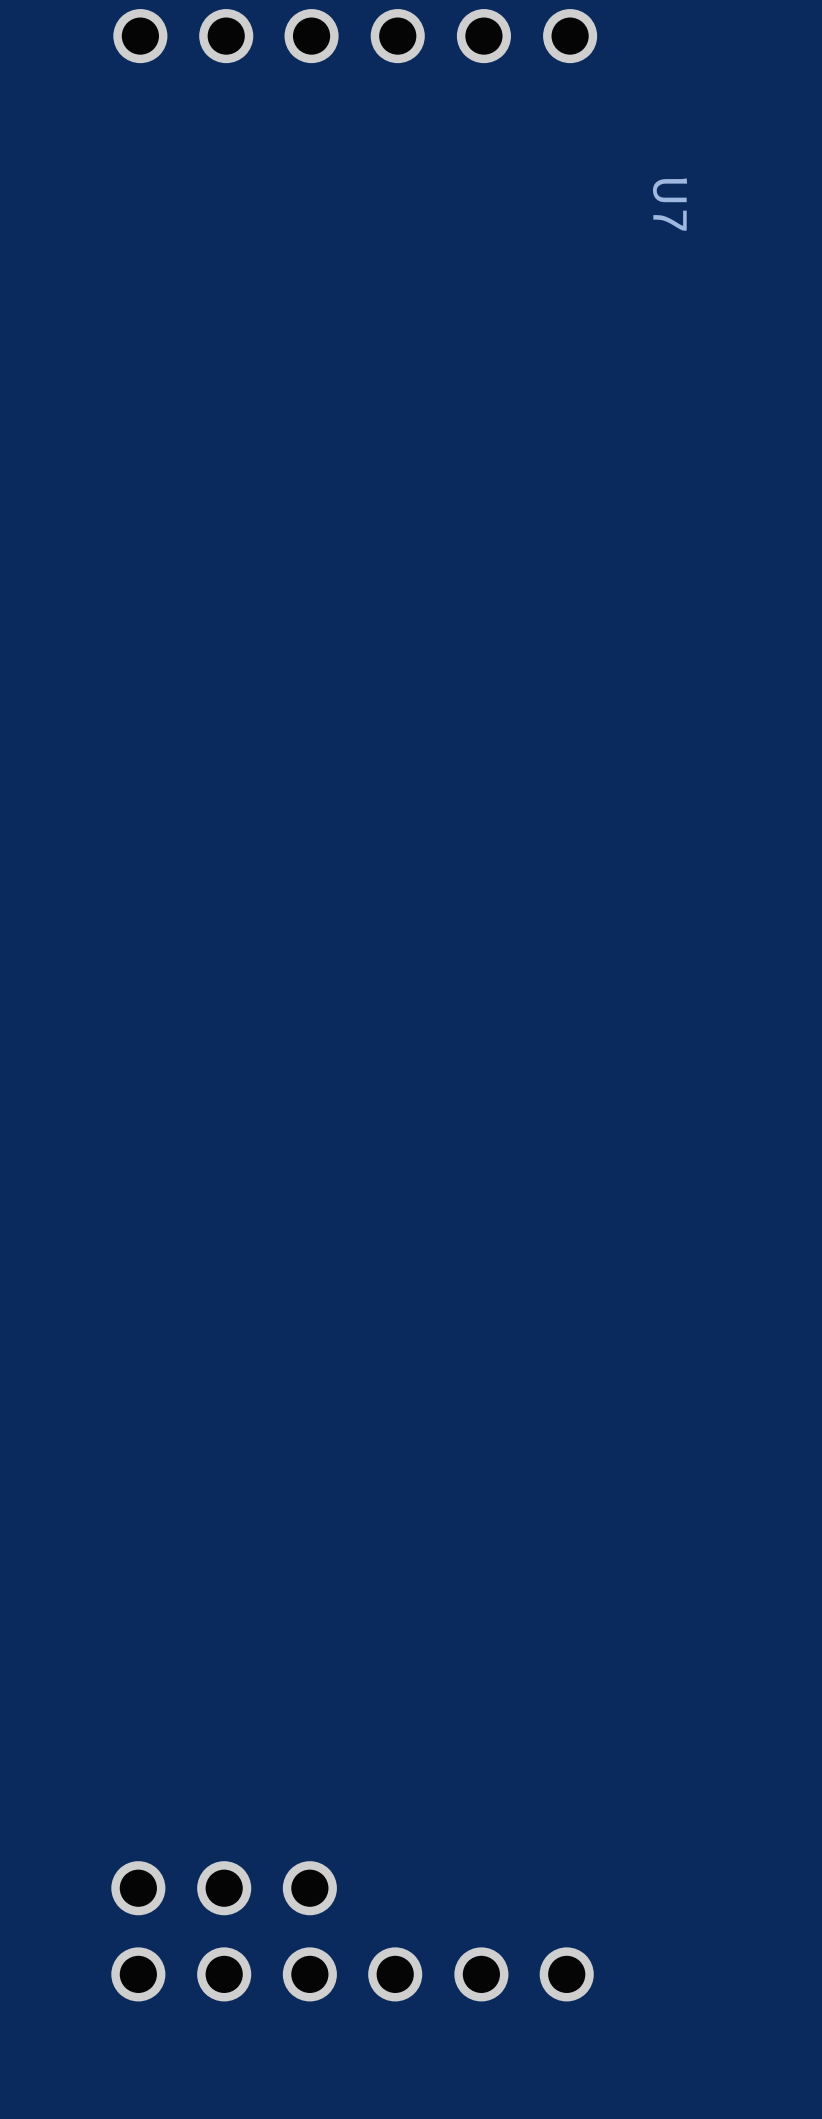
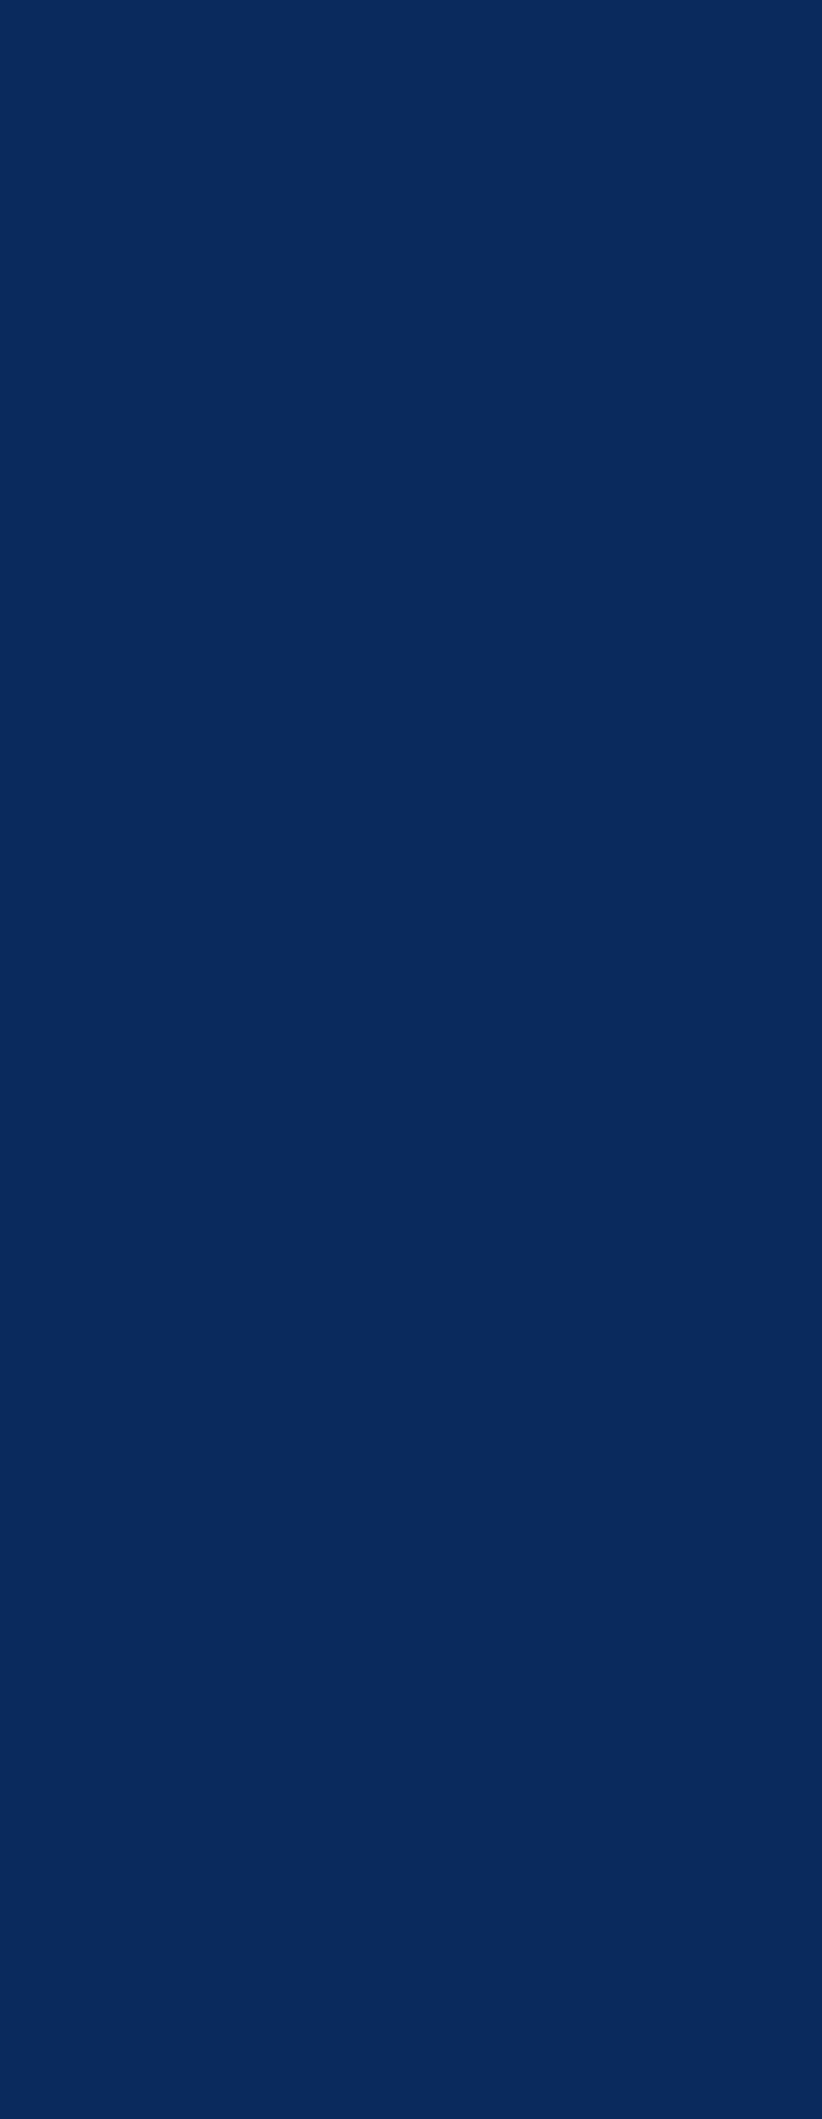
U7: (354, 1005) -> none

